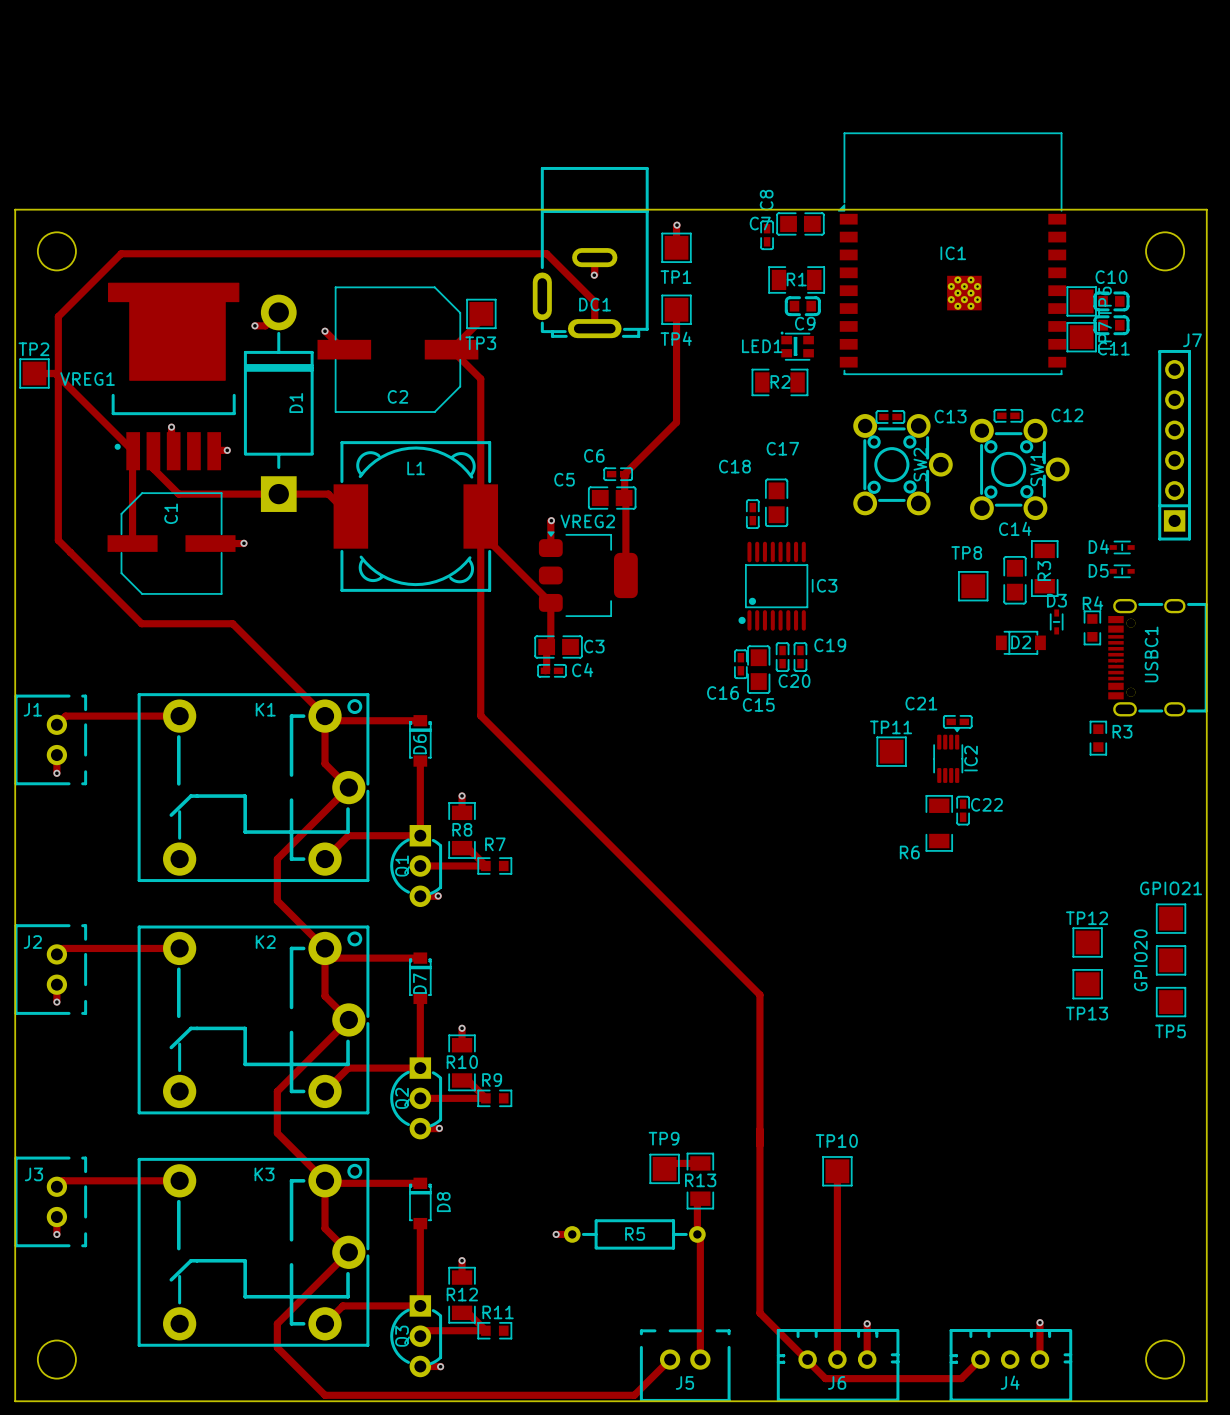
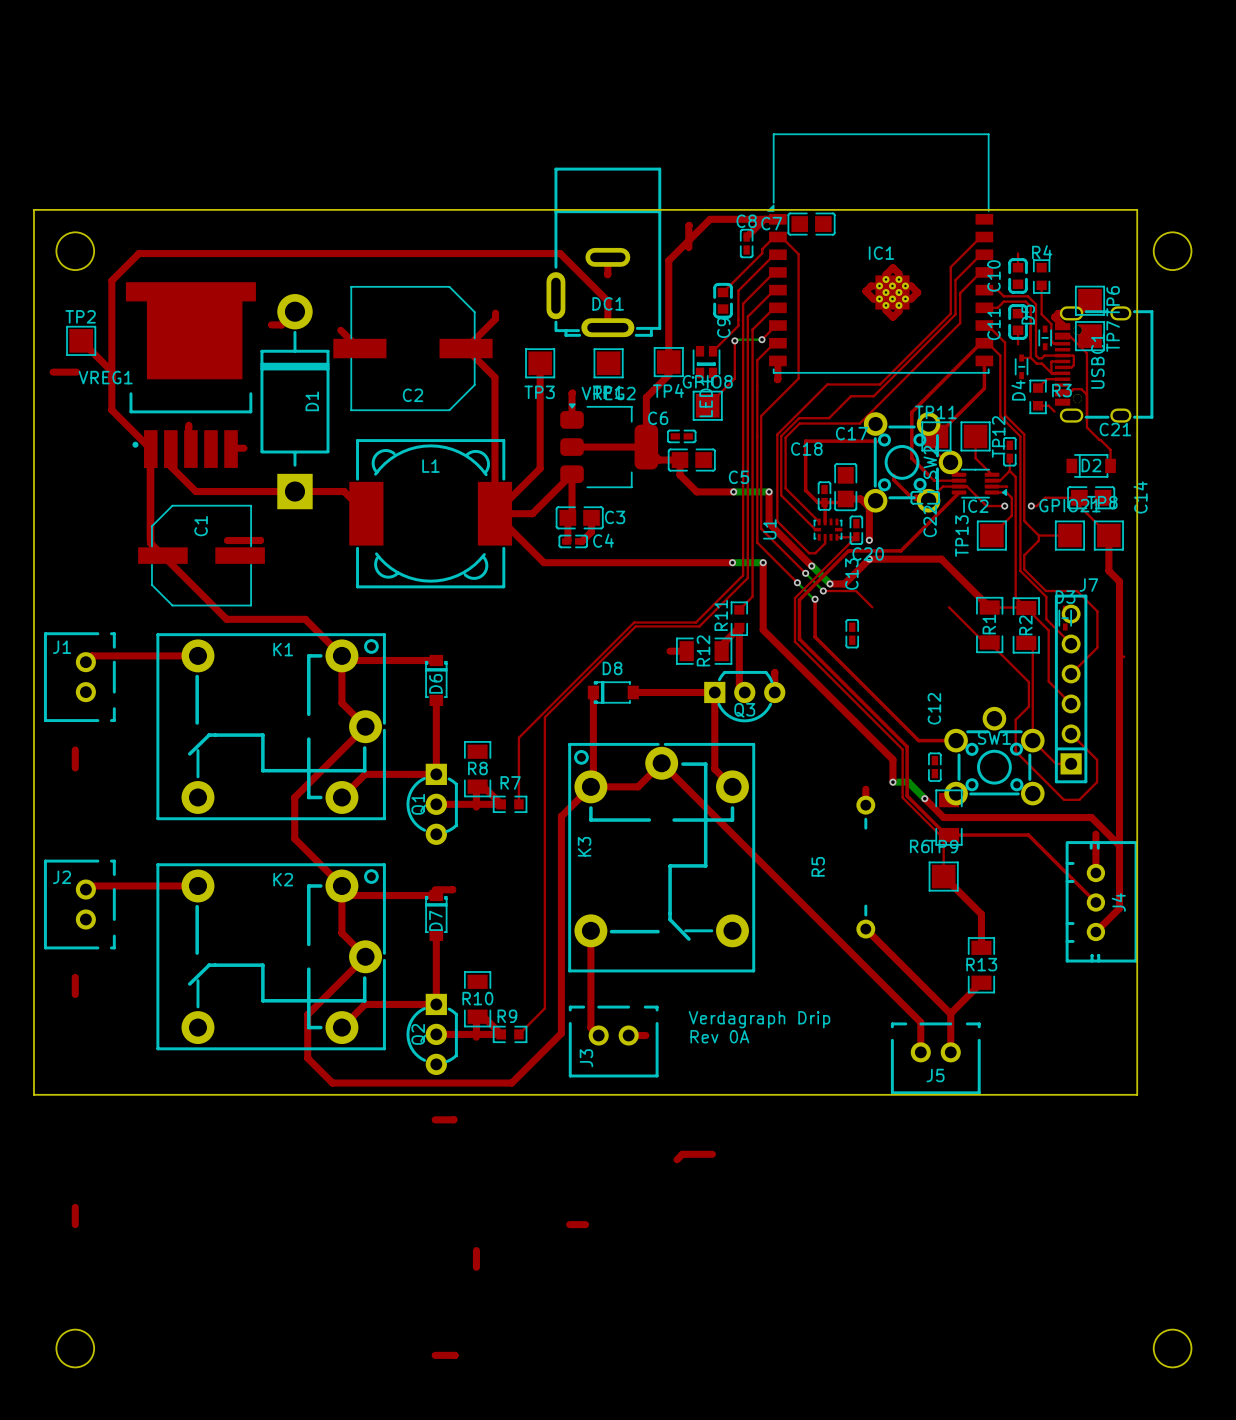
C8 name rotation: 0° (766, 200) -> 90° clockwise (746, 221)
board edge: (1129, 209) (1206, 209) (1206, 1401) (15, 1401) (15, 1103) -> (1137, 209) (1137, 1094) (33, 1094)
top track: none -> (764, 219) (746, 237)
top track: none -> (777, 219) (710, 219) (668, 260) (668, 375) (646, 397) (646, 447)
via: (677, 225) -> none
C8 position: (767, 235) -> (746, 243)
top track: none -> (984, 237) (980, 237) (950, 267) (950, 313) (879, 384) (827, 384) (777, 434) (777, 521) (809, 553) (815, 553) (825, 543) (825, 537)
TP1 position: (676, 247) -> (608, 363)
IC1 position: (952, 253) -> (880, 253)
top track: none -> (1018, 253) (1018, 267)
top track: none -> (777, 254) (774, 254) (738, 290) (738, 325) (713, 351)
top track: none -> (984, 254) (980, 254) (955, 280) (955, 314) (873, 396) (851, 396) (829, 418) (799, 418) (781, 436) (781, 495) (817, 529)
top track: none -> (777, 272) (774, 272) (743, 303) (743, 575) (695, 622) (634, 622) (518, 737) (518, 804)
top track: none -> (984, 272) (980, 272) (960, 293) (960, 323) (859, 423) (799, 423) (785, 437) (785, 488) (819, 521)
via: (594, 275) -> none
C10 name position: C10 (1111, 277) -> C10 (993, 275)
R1 rotation: 0° (796, 279) -> 90° clockwise (989, 624)
R1 position: (796, 279) -> (989, 624)
top track: none -> (898, 279) (898, 273) (892, 267) (886, 274) (886, 279) (898, 292)
top track: (93, 281) (58, 316) (58, 540) (141, 623) (232, 623) (329, 720) (420, 720) -> none
top track: none -> (1041, 285) (1041, 314) (1051, 324) (1051, 341) (1054, 343) (1062, 343)
top track: none -> (879, 286) (871, 286) (865, 291) (873, 298) (879, 298) (892, 286)
top track: none -> (777, 290) (774, 290) (747, 316) (747, 578) (699, 626) (635, 626) (544, 717) (544, 1008) (518, 1034)
top track: none -> (984, 290) (997, 290) (1003, 296) (1027, 296) (1036, 304) (1036, 355) (1038, 358) (1044, 355) (1073, 355) (1073, 365) (1071, 367) (1062, 367)
top track: none -> (723, 292) (762, 253) (762, 249) (774, 237) (781, 237) (798, 254) (798, 378) (761, 416) (761, 528) (805, 573)
top track: none -> (886, 292) (898, 305) (898, 311) (892, 317) (886, 310) (886, 305)
top track: none -> (892, 298) (905, 286) (911, 286) (917, 292) (911, 298) (905, 298)
C10 rotation: 0° (1111, 301) -> 90° clockwise (1018, 275)
C10 position: (1111, 301) -> (1018, 275)
C9 rotation: 0° (802, 306) -> 90° clockwise (723, 300)
C9 position: (802, 306) -> (723, 300)
top track: none -> (777, 307) (774, 307) (752, 329) (752, 596) (739, 609)
top track: none -> (984, 307) (997, 307) (1003, 301) (1025, 301) (1030, 306) (1030, 357)
top track: (676, 309) (676, 422) (624, 474) (625, 575) -> none
TP4 position: (676, 309) -> (668, 362)
TP3 position: (481, 313) -> (540, 363)
top track: none -> (1071, 313) (1058, 313) (1054, 317) (1062, 324)
via: (254, 325) -> none
C11 rotation: 0° (1111, 325) -> 90° clockwise (1018, 321)
C11 position: (1111, 325) -> (1018, 321)
top track: none -> (776, 325) (761, 339)
top track: none -> (984, 325) (987, 325) (1005, 342) (1005, 415) (1024, 434) (1024, 520) (1038, 535)
via: (325, 331) -> none
top track: none -> (1018, 330) (1018, 344)
top track: none -> (1062, 334) (1068, 334) (1086, 353) (1086, 427) (1110, 449) (1110, 465)
bottom track: none -> (761, 339) (734, 340)
via: none -> (761, 339)
top track: none -> (81, 340) (111, 371)
top track: none -> (734, 340) (734, 378) (707, 405)
via: none -> (734, 340)
top track: none -> (777, 343) (774, 343) (757, 360) (757, 542) (797, 582)
top track: none -> (984, 343) (987, 343) (1000, 355) (1000, 416) (1020, 436) (1020, 570) (1046, 596) (1046, 619) (1071, 643)
top track: none -> (989, 343) (980, 343) (911, 412) (911, 458) (934, 480) (959, 480)
LED1 rotation: 0° (797, 346) -> 90° counterclockwise (705, 362)
LED1 position: (797, 346) -> (705, 362)
top track: none -> (1030, 357) (1021, 357)
top track: none -> (1030, 357) (1036, 363) (1041, 363) (1051, 373) (1062, 373)
top track: none -> (777, 360) (777, 379)
top track: none -> (984, 360) (984, 388) (936, 436) (936, 452) (959, 474)
top track: none -> (1062, 361) (1051, 362) (1051, 373)
top track: none -> (540, 363) (540, 468) (494, 513)
TP2 position: (34, 373) -> (81, 340)
top track: (55, 373) (93, 411) -> (111, 280) (111, 410)
top track: none -> (1062, 379) (1046, 379) (1038, 388)
R2 rotation: 0° (779, 382) -> 90° clockwise (1026, 625)
R2 position: (779, 382) -> (1026, 625)
top track: none -> (1062, 391) (1081, 389) (1086, 394)
R3: none -> (1038, 396)
GPIO8: none -> (707, 405)
top track: none -> (1038, 405) (1048, 405) (1054, 411)
C12 rotation: 0° (1008, 415) -> 90° clockwise (934, 767)
C12 position: (1008, 415) -> (934, 767)
C12 name position: C12 (1067, 415) -> C12 (934, 708)
C13 name position: C13 (950, 416) -> C13 (851, 574)
C13 rotation: 0° (890, 417) -> 90° clockwise (852, 633)
C13 position: (890, 417) -> (852, 633)
via: (171, 427) -> none
top track: none -> (975, 436) (975, 458) (992, 474)
top track: none -> (876, 441) (805, 441) (805, 490) (817, 502) (842, 502) (845, 498) (860, 498) (869, 507) (869, 540)
J7 position: (1174, 445) -> (1071, 688)
top track: none -> (572, 447) (646, 447)
top track: none -> (646, 447) (659, 460) (679, 460) (679, 475) (696, 491) (733, 491)
via: (227, 450) -> none
top track: none -> (150, 451) (150, 543) (226, 619) (305, 619) (346, 660) (436, 660)
top track: none -> (1009, 458) (1009, 470)
SW1 rotation: 0° (1019, 469) -> 90° counterclockwise (994, 756)
SW1 position: (1019, 469) -> (994, 756)
top track: none -> (1009, 470) (1000, 480) (992, 480)
top track: none -> (1009, 470) (1015, 476) (1015, 597) (1048, 630) (1048, 681) (1071, 703)
C6 position: (618, 474) -> (681, 436)
top track: none -> (893, 475) (893, 480) (911, 497) (918, 497)
C5 name position: C5 (564, 479) -> C5 (738, 477)
top track: none -> (992, 486) (1007, 487)
bottom track: none -> (733, 491) (769, 491)
via: none -> (733, 491)
top track: none -> (769, 491) (769, 523) (811, 566)
via: none -> (769, 491)
top track: none -> (959, 492) (900, 550) (848, 550) (799, 599) (799, 639) (907, 746) (907, 795) (946, 835) (1028, 835) (1095, 902)
top track: none -> (991, 492) (1006, 492) (1011, 497) (1011, 515) (991, 535)
C5 position: (612, 498) -> (691, 460)
top track: none -> (931, 497) (942, 486) (967, 486) (986, 506) (1004, 506)
C17 position: (776, 502) -> (845, 487)
top track: none -> (824, 502) (825, 521)
via: none -> (1004, 506)
top track: none -> (1031, 506) (1036, 506) (1045, 497) (1079, 497) (1079, 506) (1108, 535) (1108, 570) (1119, 581) (1119, 908) (1095, 932)
via: none -> (1031, 506)
C18 position: (752, 514) -> (824, 496)
top track: none -> (494, 513) (532, 513) (572, 474) (572, 513) (567, 517) (566, 541)
top track: none -> (494, 513) (543, 562) (732, 562)
top track: (551, 520) (550, 548) -> (572, 392) (572, 419)
via: (551, 520) -> none
top track: none -> (591, 517) (591, 532) (579, 541)
U1: none -> (828, 529)
top track: none -> (1038, 535) (1069, 535)
top track: none -> (1038, 535) (1038, 540) (1024, 555) (1024, 569) (1045, 591) (1077, 591) (1097, 611) (1097, 647) (1071, 673)
top track: none -> (856, 536) (795, 598) (795, 641) (902, 749) (902, 797) (943, 838) (943, 876) (981, 914) (981, 947)
top track: none -> (836, 537) (855, 537)
C1 position: (171, 543) -> (201, 555)
via: (243, 543) -> none
via: none -> (869, 540)
D4 name position: D4 (1098, 546) -> D4 (1018, 390)
D4 rotation: 0° (1122, 547) -> 90° clockwise (1021, 366)
D4 position: (1122, 547) -> (1021, 366)
via: none -> (869, 559)
bottom track: none -> (732, 562) (763, 562)
via: none -> (732, 562)
top track: none -> (763, 562) (763, 629) (892, 759) (892, 782)
via: none -> (763, 562)
R3: (1044, 568) -> none
bottom track: none -> (811, 566) (830, 583)
via: none -> (811, 566)
D5 rotation: 0° (1122, 571) -> 90° clockwise (1045, 337)
D5 position: (1122, 571) -> (1045, 337)
VREG2 position: (588, 574) -> (609, 445)
bottom track: none -> (805, 573) (823, 591)
via: none -> (805, 573)
C14 rotation: 0° (1014, 580) -> 90° clockwise (1091, 497)
C14 position: (1014, 580) -> (1091, 497)
IC3: (773, 586) -> none
bottom track: none -> (797, 582) (815, 599)
via: none -> (797, 582)
TP8 position: (973, 586) -> (1108, 535)
top track: none -> (830, 583) (844, 583) (869, 559) (941, 559) (989, 607) (1026, 608)
via: none -> (830, 583)
top track: none -> (823, 591) (856, 591) (872, 607)
via: none -> (823, 591)
top track: none -> (815, 599) (815, 637) (918, 740) (956, 740)
via: none -> (815, 599)
top track: none -> (949, 607) (984, 642) (989, 642)
R4 position: (1092, 627) -> (1041, 276)
top track: none -> (989, 638) (989, 642) (1028, 682) (1028, 706) (1015, 719) (1015, 751) (1064, 799) (1079, 799) (1097, 782) (1097, 759) (1071, 733)
D2 position: (1020, 642) -> (1091, 465)
C3 position: (558, 646) -> (579, 517)
top track: none -> (1026, 642) (1032, 649) (1032, 740) (1056, 763) (1071, 763)
top track: none -> (669, 651) (686, 651)
top track: none -> (721, 651) (721, 645) (739, 627) (739, 687) (744, 692)
C20 position: (782, 657) -> (856, 530)
C19: (800, 657) -> none
USBC1 position: (1157, 657) -> (1104, 364)
top track: none -> (197, 655) (92, 655) (85, 662)
C16: (740, 664) -> none
C15: (758, 669) -> none
top track: (545, 670) (546, 646) (550, 642) (550, 602) (480, 532) (480, 715) (759, 994) (759, 1313) (825, 1378) (961, 1378) (980, 1359) -> none
C4 position: (552, 670) -> (573, 541)
top track: none -> (774, 672) (774, 692)
top track: none -> (593, 692) (593, 784)
top track: none -> (633, 692) (714, 692) (714, 769) (732, 786)
C21 name position: C21 (921, 703) -> C21 (1115, 429)
top track: (179, 716) (65, 716) (56, 724) -> none
top track: (325, 716) (325, 763) (348, 787) (277, 859) (277, 900) (334, 958) (420, 958) -> (341, 655) (341, 703) (365, 726) (294, 797) (294, 838) (351, 895) (436, 895)
C21 rotation: 0° (957, 721) -> 90° clockwise (1009, 451)
C21 position: (957, 721) -> (1009, 451)
R3: (1098, 738) -> none
J1 position: (50, 739) -> (79, 677)
D6 position: (420, 740) -> (436, 680)
TP11 position: (891, 751) -> (936, 436)
IC2 rotation: 0° (948, 754) -> 90° clockwise (979, 483)
IC2 position: (948, 754) -> (979, 483)
top track: (420, 761) (420, 835) (348, 835) (325, 859) -> (436, 700) (436, 774) (365, 774) (341, 797)
via: (56, 773) -> none
K1 position: (253, 787) -> (271, 726)
bottom track: none -> (892, 782) (908, 782) (924, 798)
via: none -> (892, 782)
top track: none -> (594, 783) (561, 816) (561, 1033) (511, 1083) (332, 1083) (307, 1058) (307, 1014) (365, 956) (341, 933) (341, 885)
top track: none -> (590, 786) (638, 786) (661, 763) (920, 1022) (920, 1052)
top track: none -> (865, 789) (865, 805)
via: (462, 795) -> none
top track: none -> (924, 798) (943, 817) (1091, 817) (1119, 845)
via: none -> (924, 798)
C22 rotation: 0° (963, 810) -> 90° clockwise (925, 497)
C22 position: (963, 810) -> (925, 497)
R8 position: (462, 830) -> (477, 769)
top track: none -> (1095, 834) (1095, 873)
top track: (462, 848) (468, 848) (485, 866) (420, 866) -> (477, 786) (483, 786) (501, 804) (436, 804)
Q1 position: (416, 866) -> (432, 804)
R7 position: (494, 866) -> (510, 804)
top track: none -> (197, 885) (89, 885) (85, 889)
via: (438, 896) -> none
TP12 name rotation: 0° (1087, 918) -> 90° counterclockwise (998, 437)
GPIO21 position: (1171, 918) -> (1069, 535)
top track: none -> (865, 929) (950, 1014)
top track: none -> (590, 930) (590, 1027) (598, 1035)
TP12 position: (1087, 942) -> (975, 436)
top track: (179, 948) (62, 948) (56, 954) -> none
top track: (325, 948) (325, 996) (348, 1019) (277, 1091) (277, 1133) (328, 1184) -> none
GPIO20: (1171, 960) -> none
J2 position: (50, 969) -> (79, 904)
D7 position: (420, 978) -> (436, 915)
TP13 position: (1087, 984) -> (991, 535)
top track: none -> (981, 982) (950, 1013) (950, 1052)
top track: (420, 998) (420, 1068) (348, 1068) (325, 1091) -> (436, 935) (436, 1004) (365, 1004) (341, 1027)
via: (56, 1002) -> none
TP5: (1171, 1002) -> none
TP13 name rotation: 0° (1087, 1013) -> 90° counterclockwise (961, 536)
K2 position: (253, 1019) -> (271, 956)
text: none -> Verdagraph Drip (759, 1019)
via: (462, 1028) -> none
top track: none -> (628, 1035) (645, 1035)
text: none -> Rev 0A (719, 1036)
R10 position: (462, 1062) -> (477, 999)
top track: (462, 1080) (468, 1080) (485, 1098) (420, 1098) -> (477, 1016) (483, 1016) (501, 1034) (436, 1034)
Q2 position: (416, 1098) -> (432, 1034)
R9 position: (494, 1098) -> (510, 1034)
via: (439, 1128) -> none
TP9 position: (664, 1168) -> (943, 876)
top track: (837, 1171) (837, 1359) -> none
TP10: (837, 1171) -> none
top track: (179, 1180) (62, 1180) (56, 1186) -> none
top track: (325, 1180) (325, 1228) (348, 1252) (277, 1323) (277, 1347) (325, 1395) (634, 1395) (670, 1359) -> none
R13 position: (700, 1181) -> (981, 965)
top track: (327, 1183) (420, 1183) -> none
top track: (700, 1198) (697, 1201) (697, 1234) (700, 1237) (700, 1359) -> none
J3 rotation: 0° (50, 1201) -> 90° counterclockwise (613, 1041)
J3 position: (50, 1201) -> (613, 1041)
D8 rotation: 0° (420, 1203) -> 90° counterclockwise (613, 692)
D8 position: (420, 1203) -> (613, 692)
R5 footprint: [563, 1219, 706, 1250] -> [856, 795, 876, 939]
top track: (420, 1223) (420, 1305) (342, 1305) (325, 1323) -> none
R5 name position: R5 (635, 1233) -> R5 (818, 866)
via: (56, 1234) -> none
via: (556, 1234) -> none
K3 rotation: 0° (253, 1252) -> 90° counterclockwise (661, 857)
K3 position: (253, 1252) -> (661, 857)
via: (462, 1260) -> none
R12 rotation: 0° (462, 1295) -> 90° clockwise (704, 651)
R12 position: (462, 1295) -> (704, 651)
top track: (462, 1312) (468, 1312) (485, 1330) (425, 1330) (420, 1336) -> none
R11 name position: R11 (498, 1312) -> R11 (721, 615)
top track: (1039, 1322) (1039, 1359) -> none
via: (1039, 1322) -> none
top track: (867, 1323) (867, 1359) -> none
via: (867, 1323) -> none
R11 rotation: 0° (494, 1330) -> 90° clockwise (739, 618)
R11 position: (494, 1330) -> (739, 618)
Q3 rotation: 0° (416, 1336) -> 90° counterclockwise (744, 696)
Q3 position: (416, 1336) -> (744, 696)
J5 position: (685, 1365) -> (935, 1058)
J6: (838, 1365) -> none
J4 rotation: 0° (1010, 1365) -> 90° counterclockwise (1101, 901)
J4 position: (1010, 1365) -> (1101, 901)
via: (440, 1366) -> none

